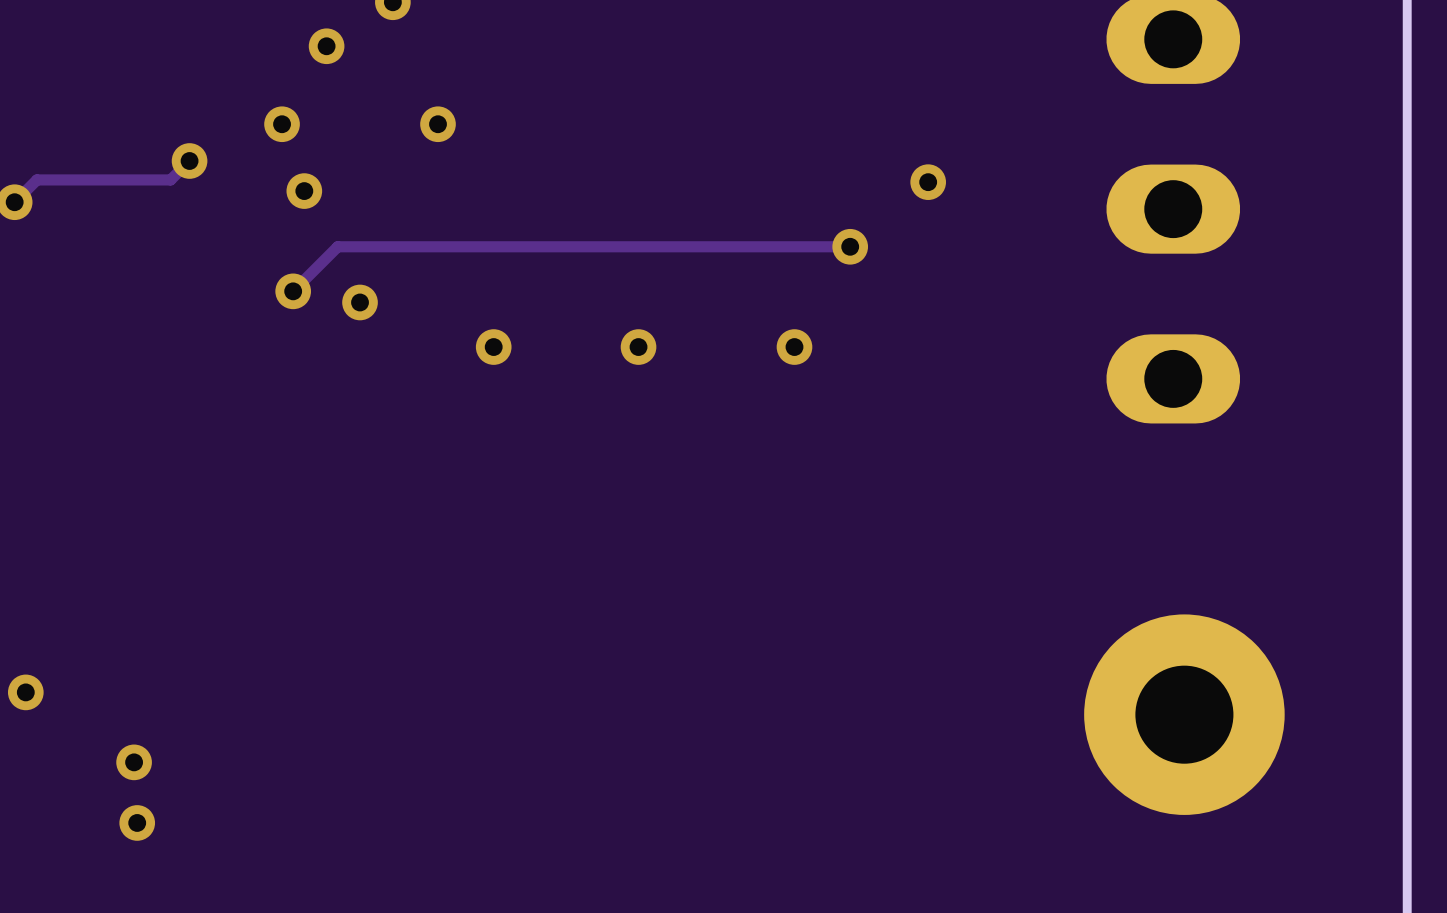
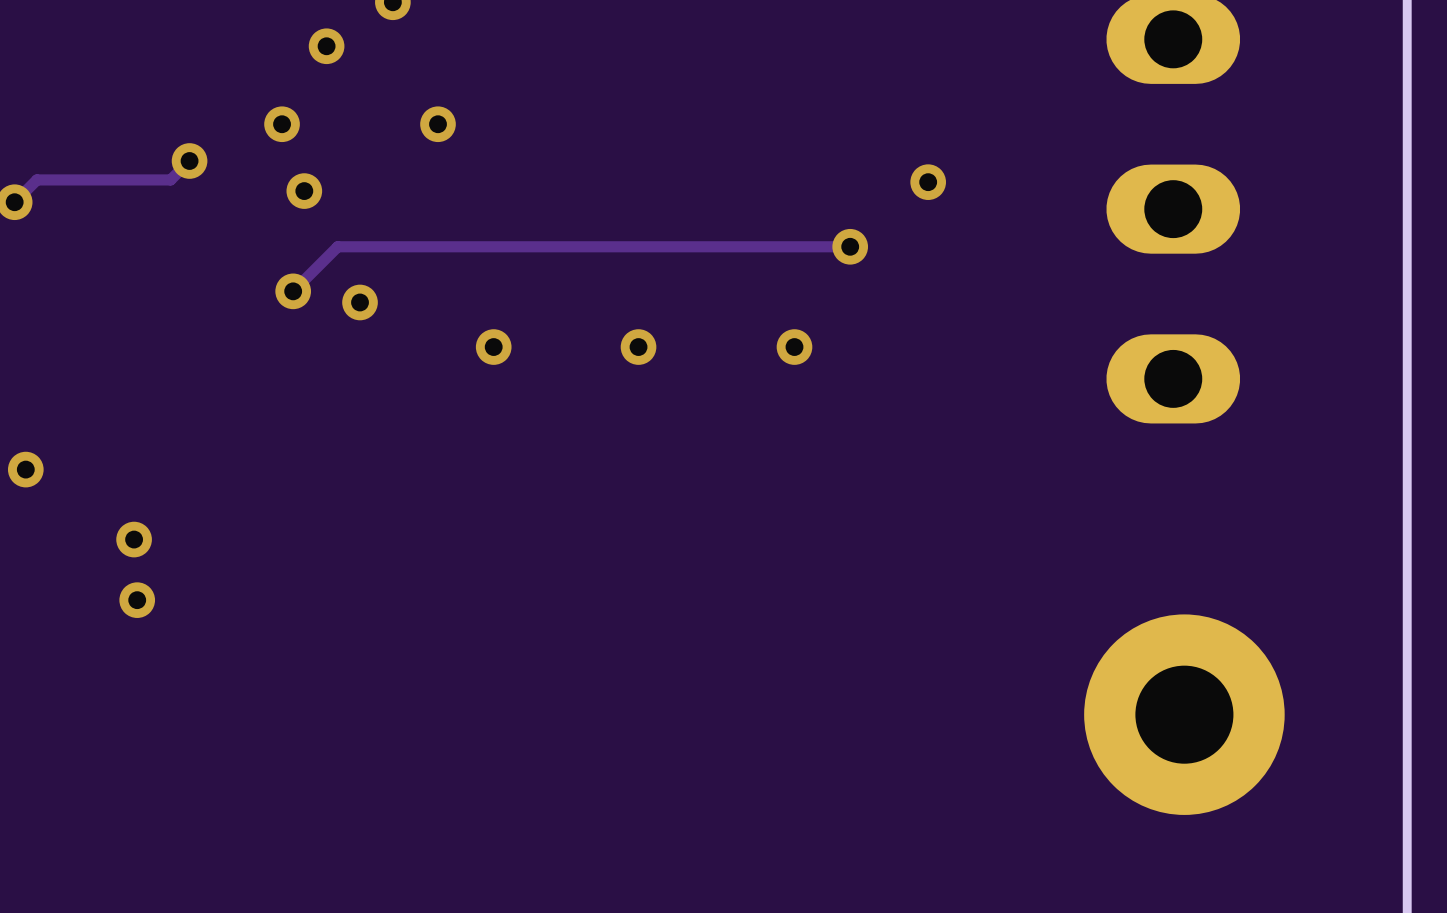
via: none -> (25, 469)
via: none -> (134, 539)
via: none -> (137, 600)
via: (25, 692) -> none
via: (134, 762) -> none
via: (137, 822) -> none

